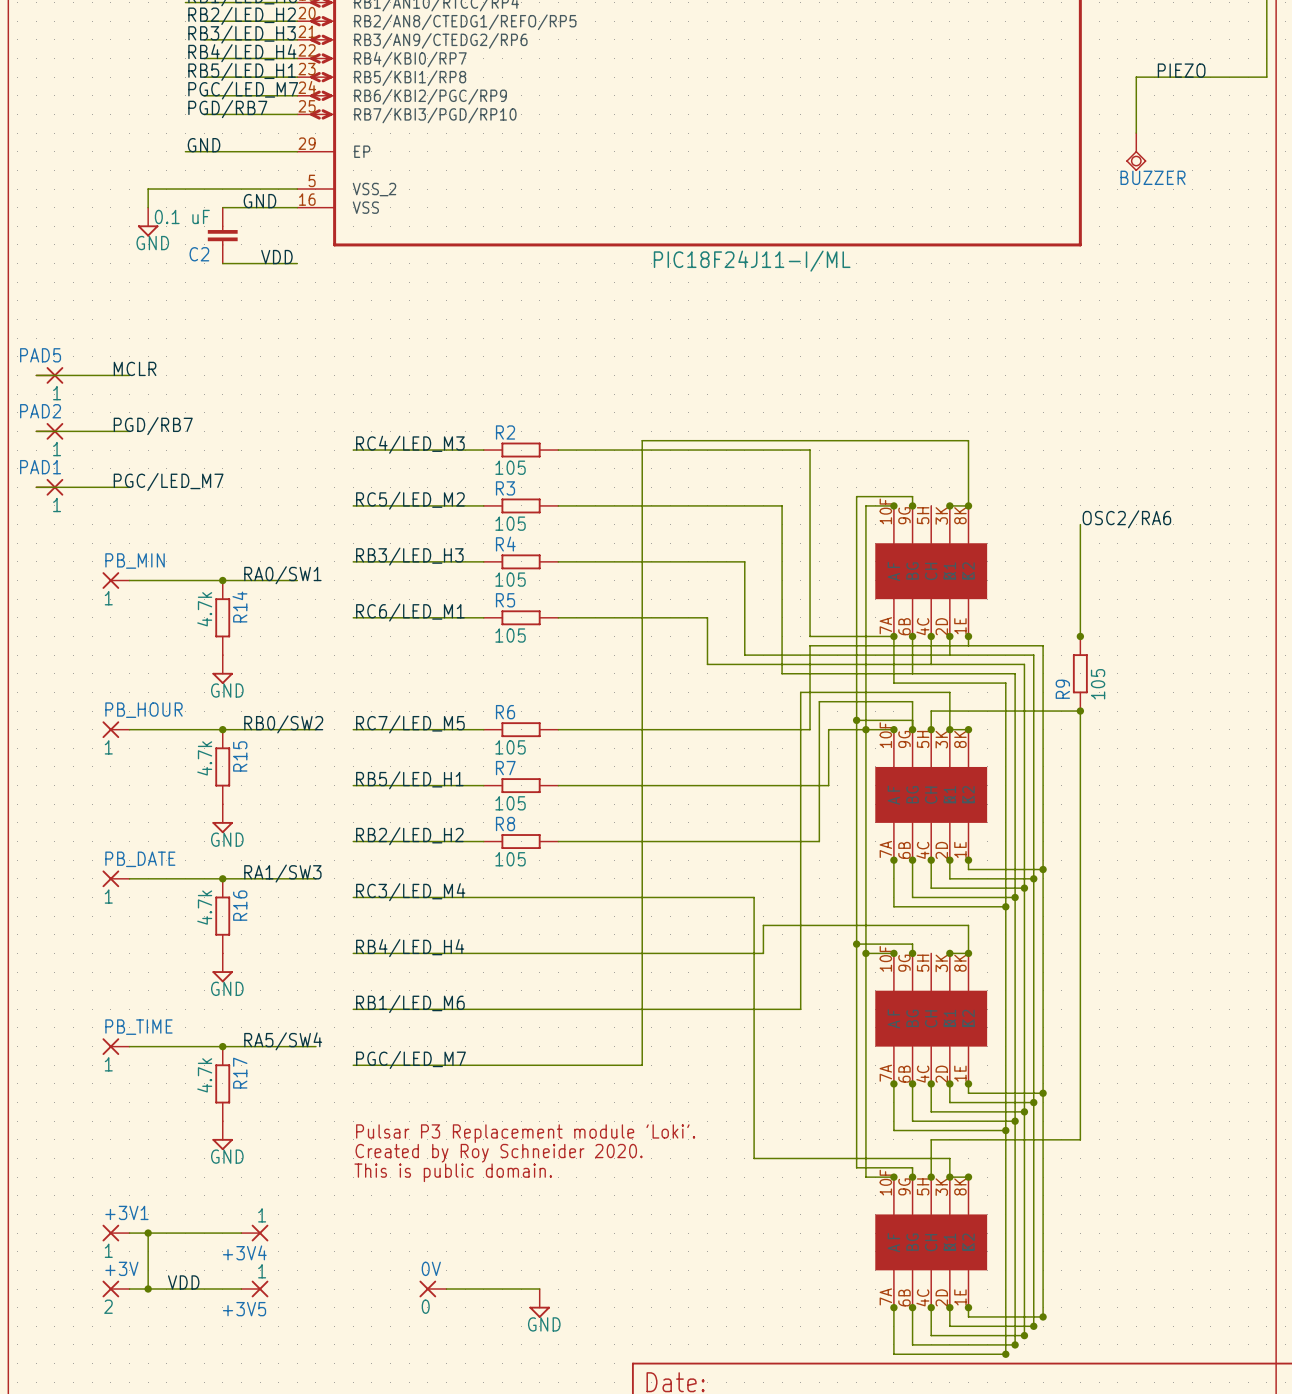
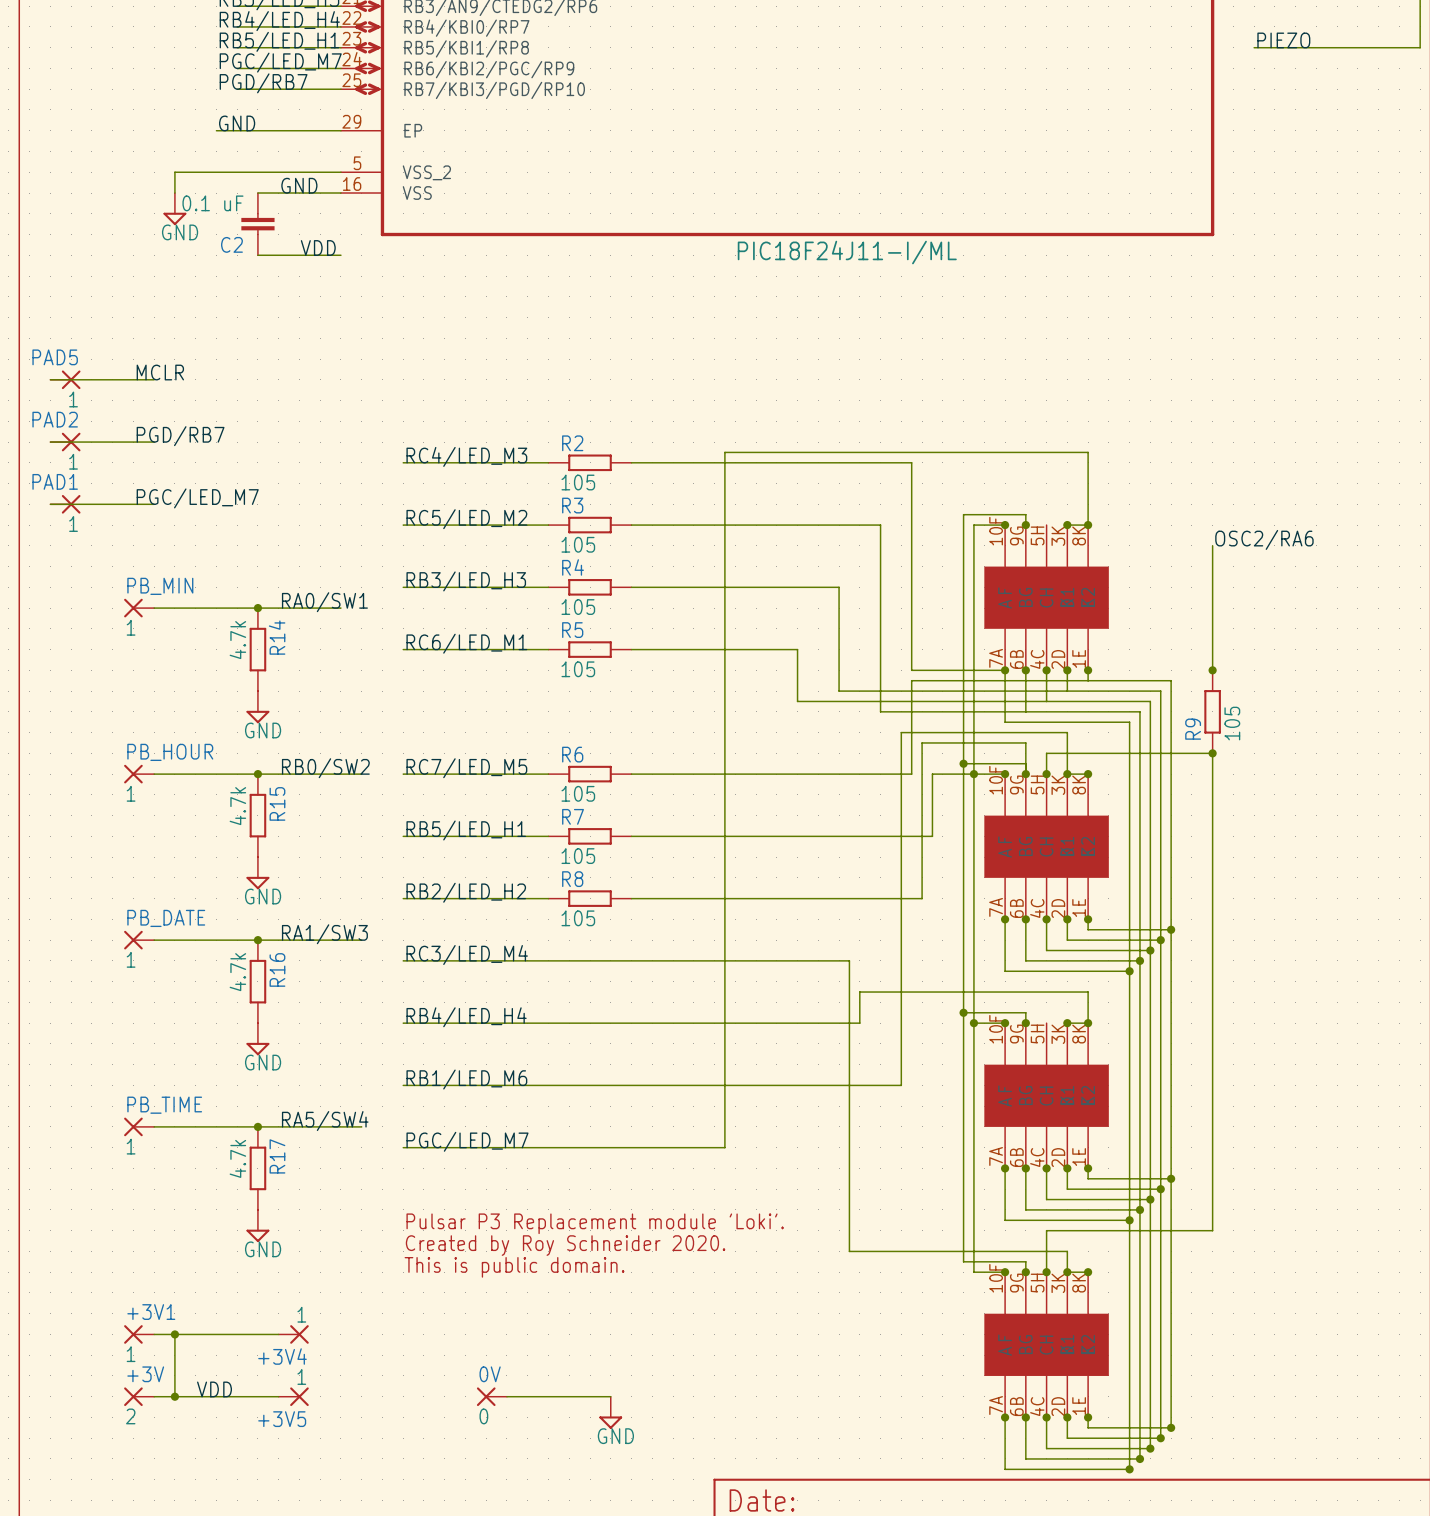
label position: PIEZO (1181, 70) -> PIEZO (1283, 40)
wire: (1136, 77) (1136, 133) -> (1274, 47) (1254, 47)
BUZZER: (1136, 151) -> none

